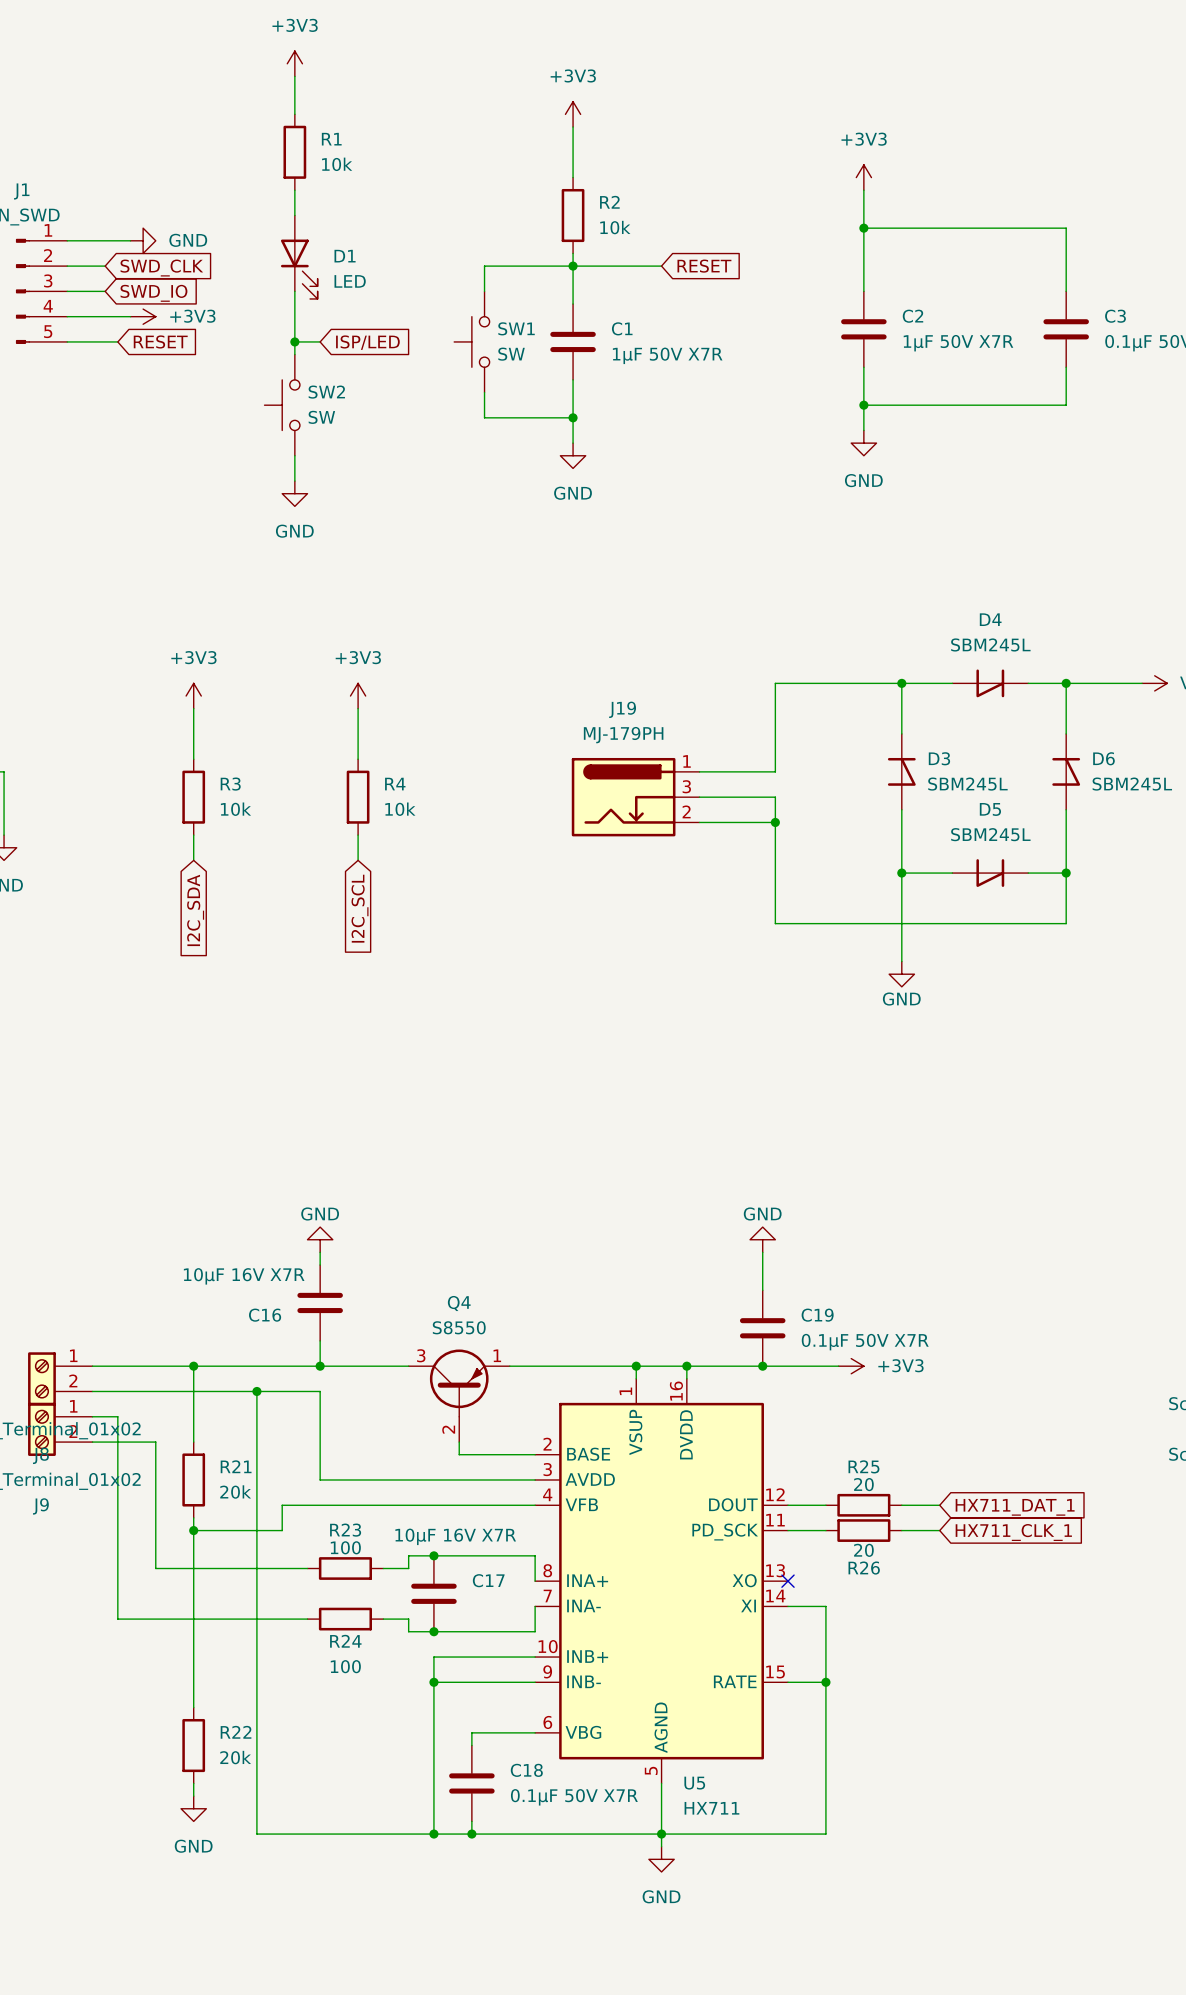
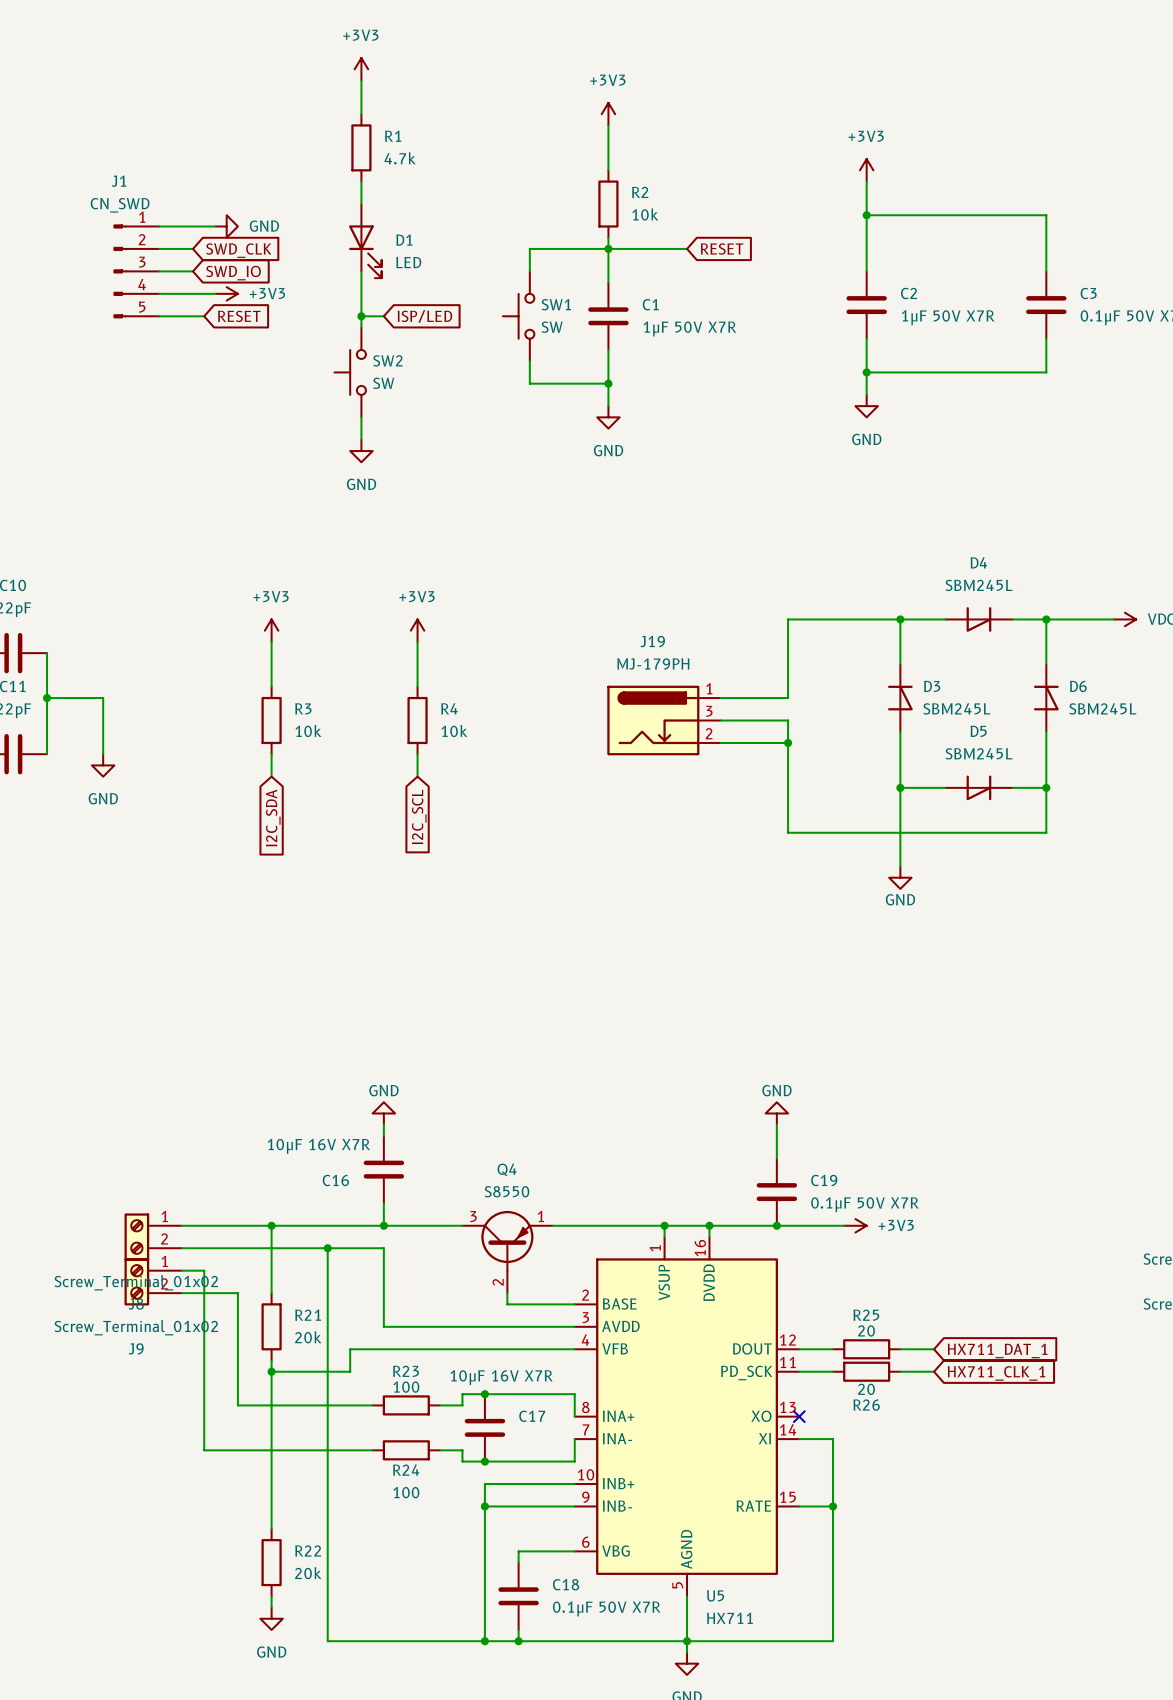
R1 value: 10k (337, 164) -> 4.7k (400, 158)

